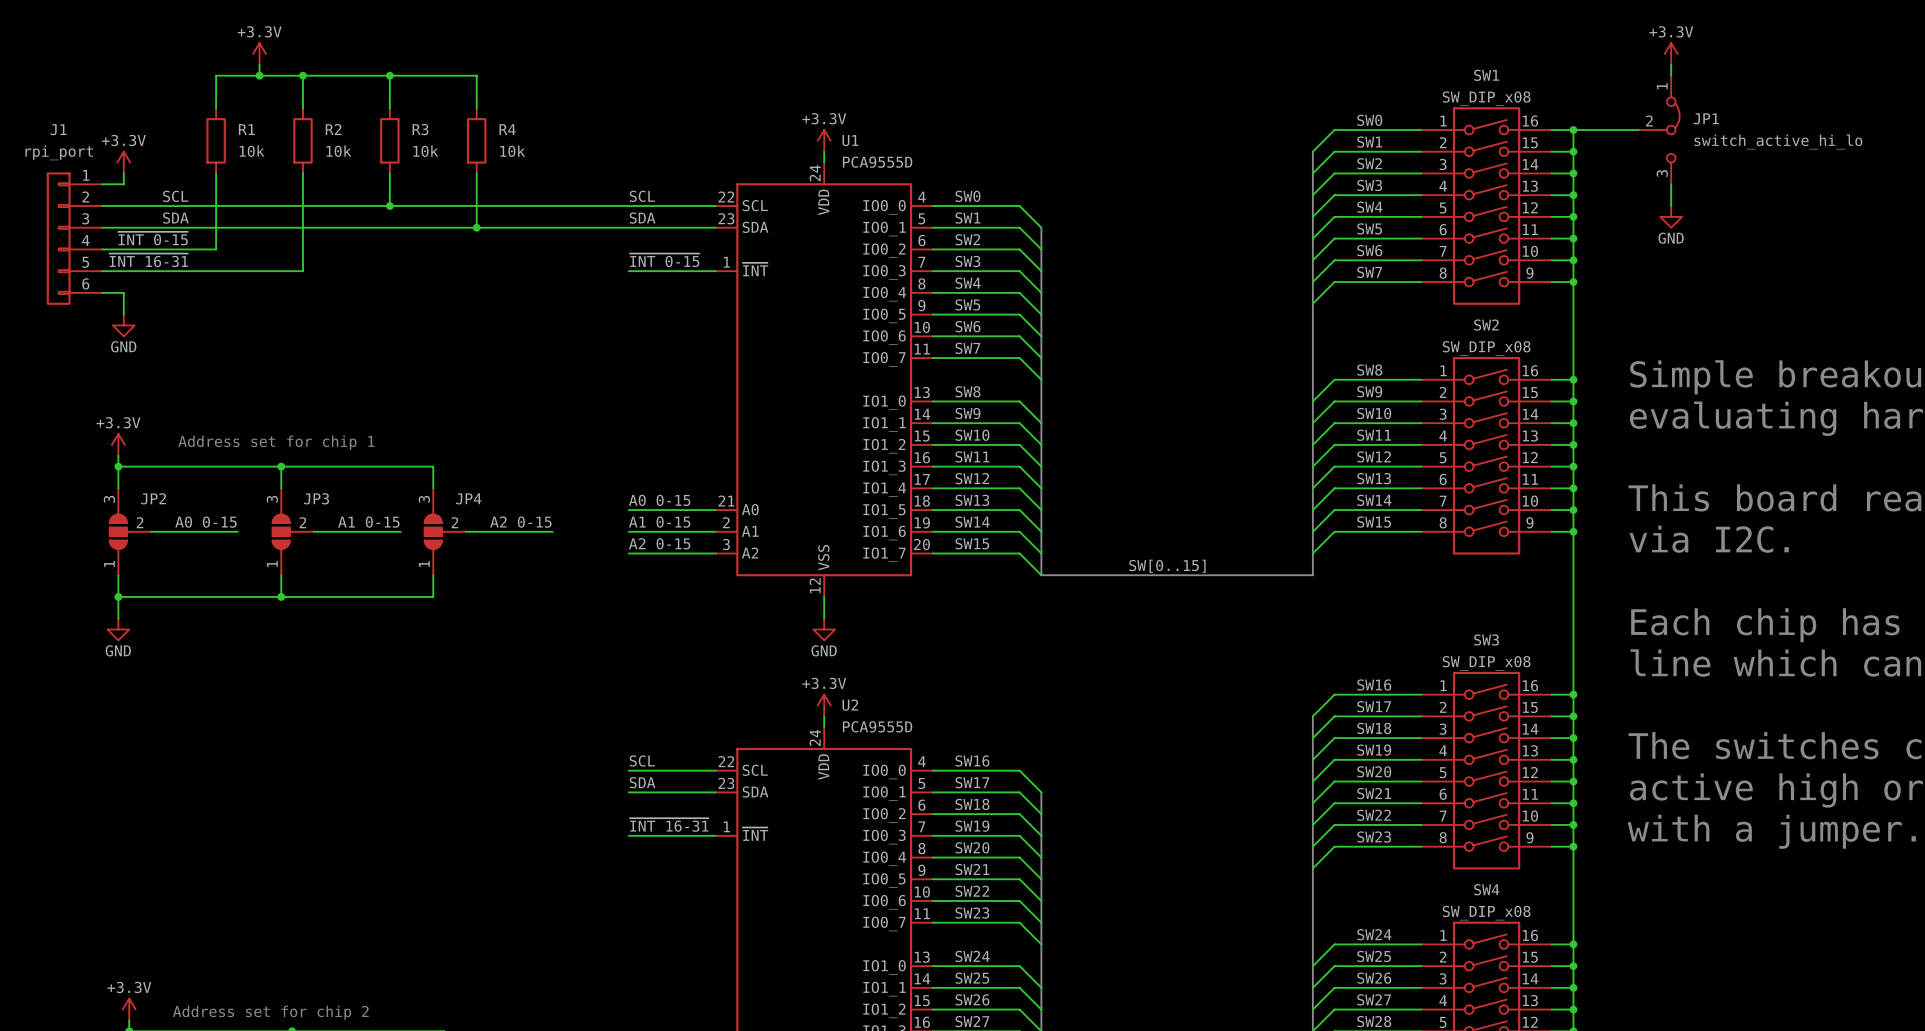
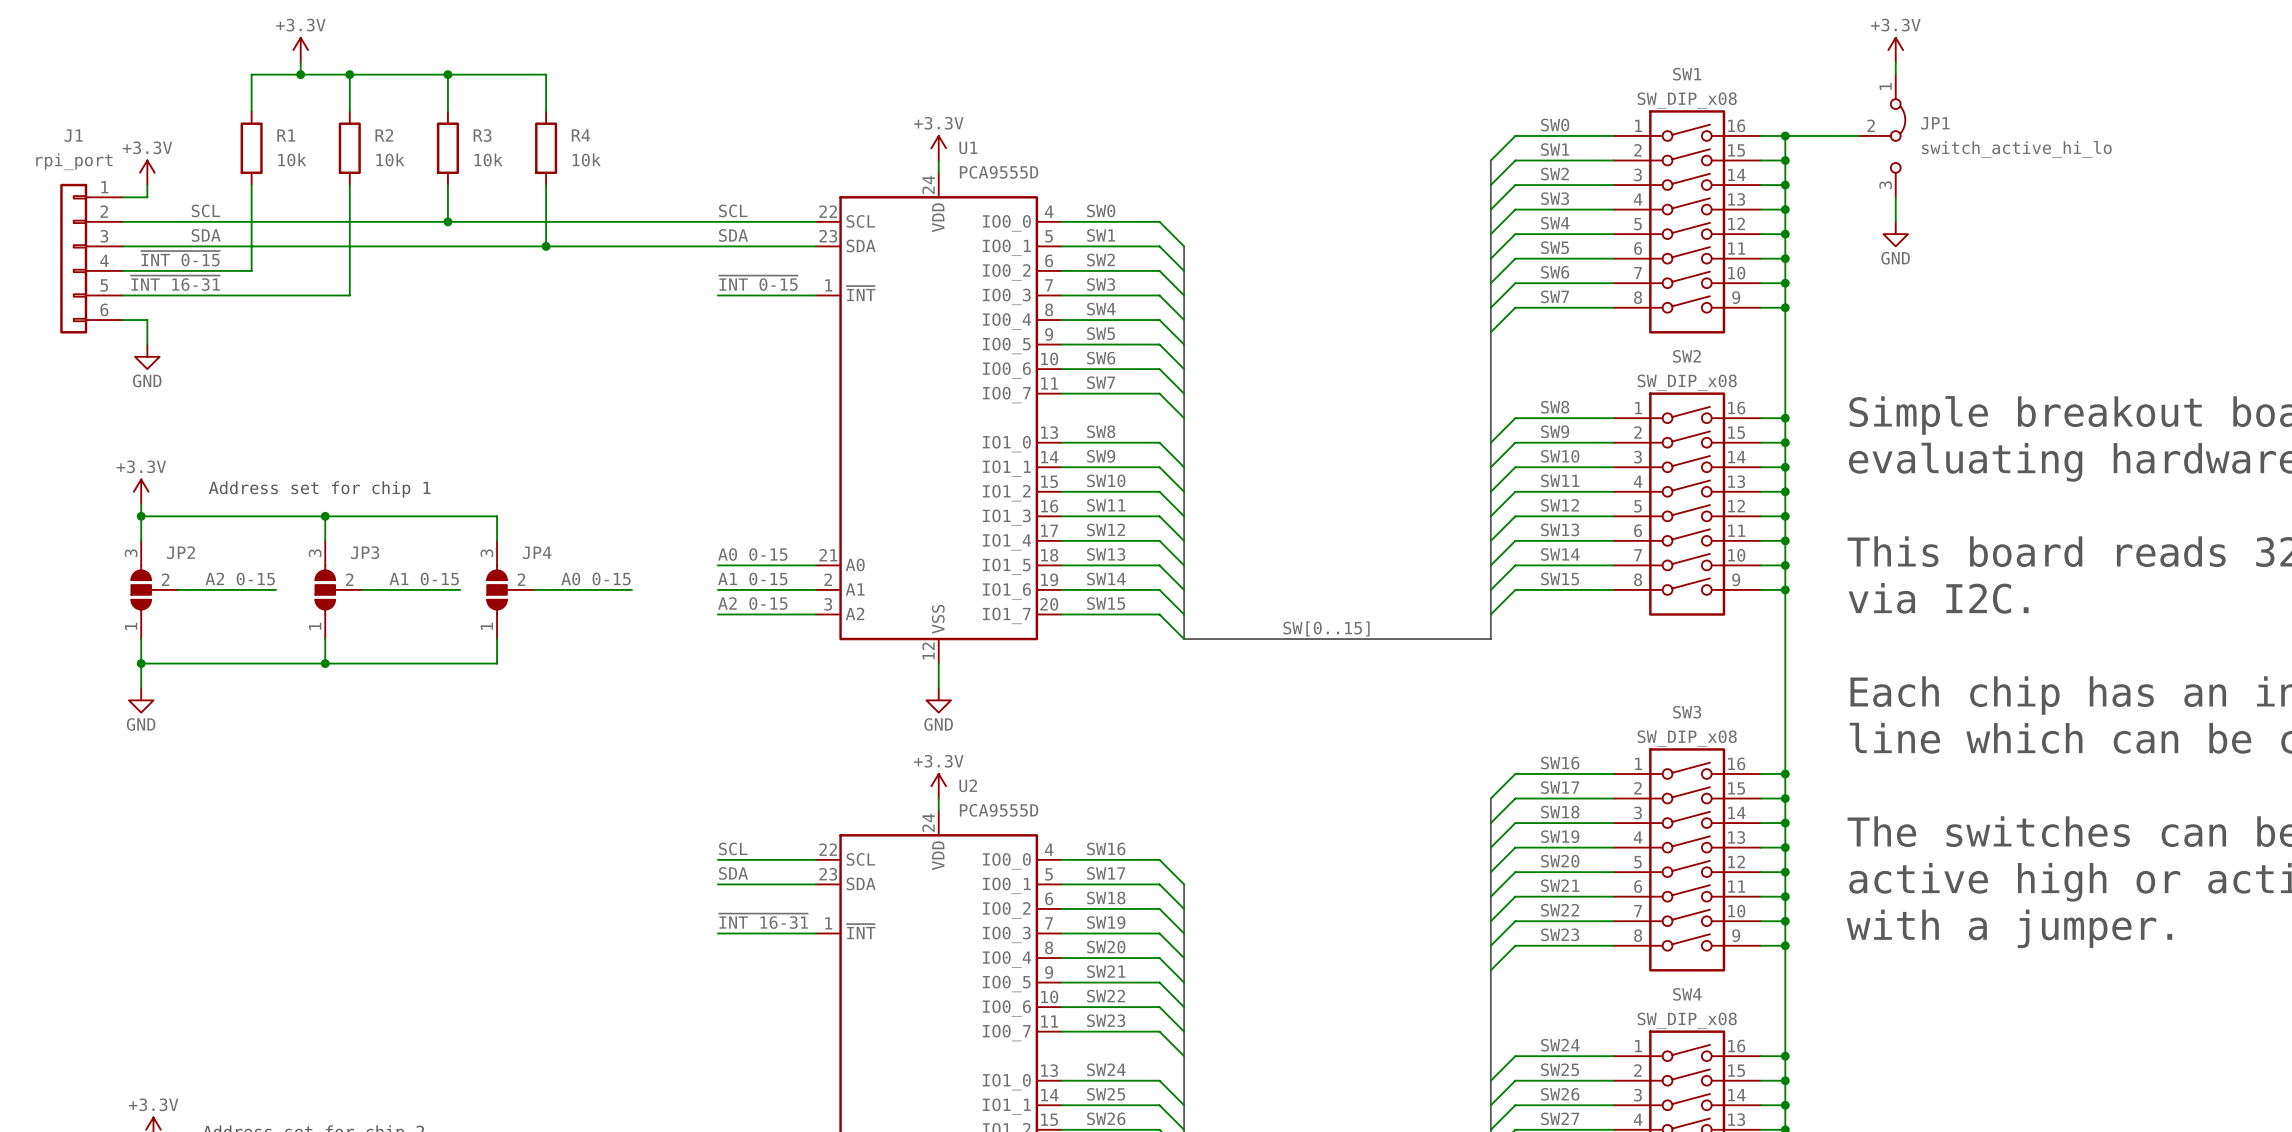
label: A0 0-15 (205, 522) -> A2 0-15 (240, 579)
label: A2 0-15 (520, 522) -> A0 0-15 (596, 579)

